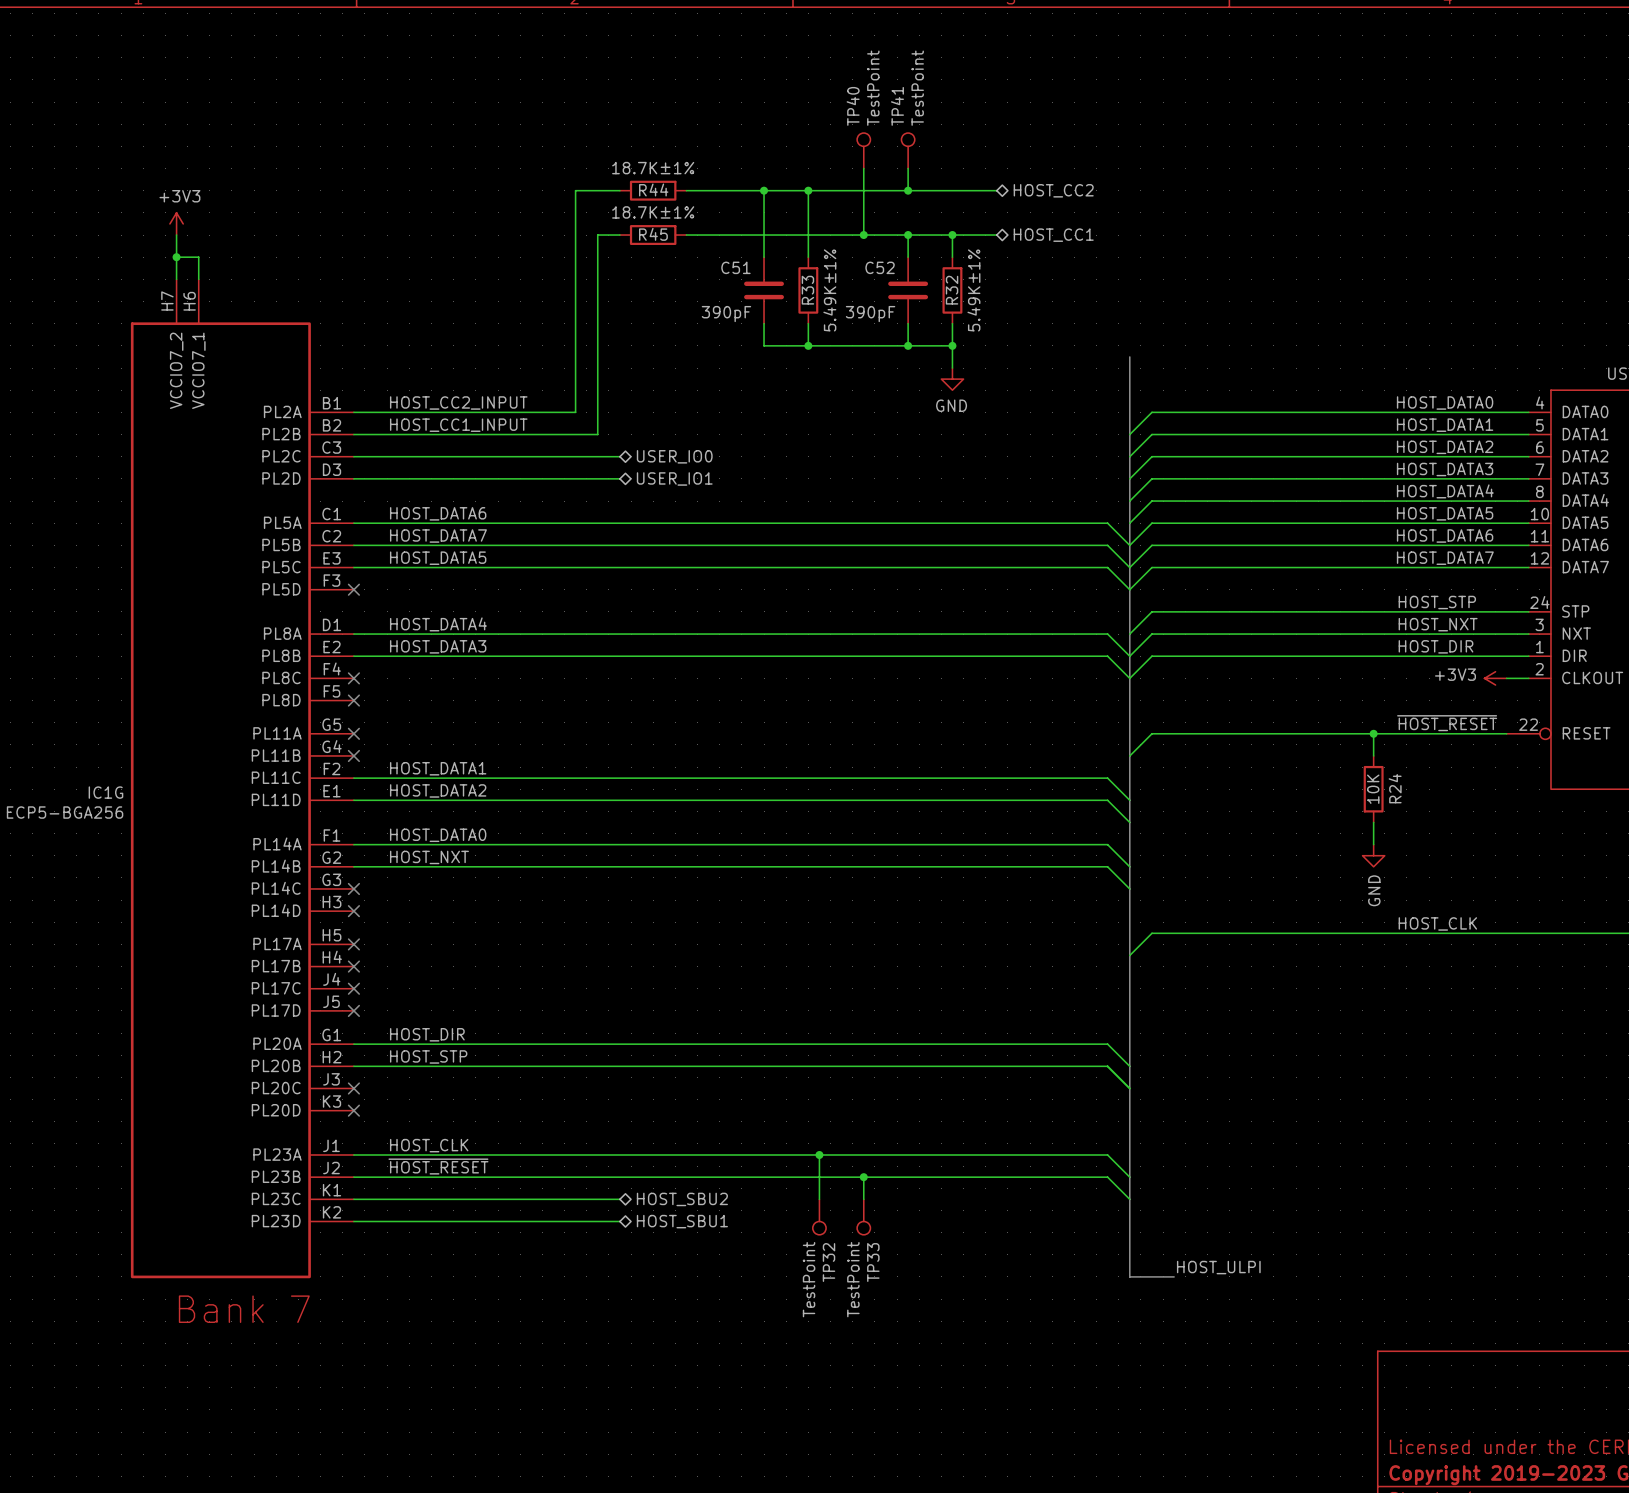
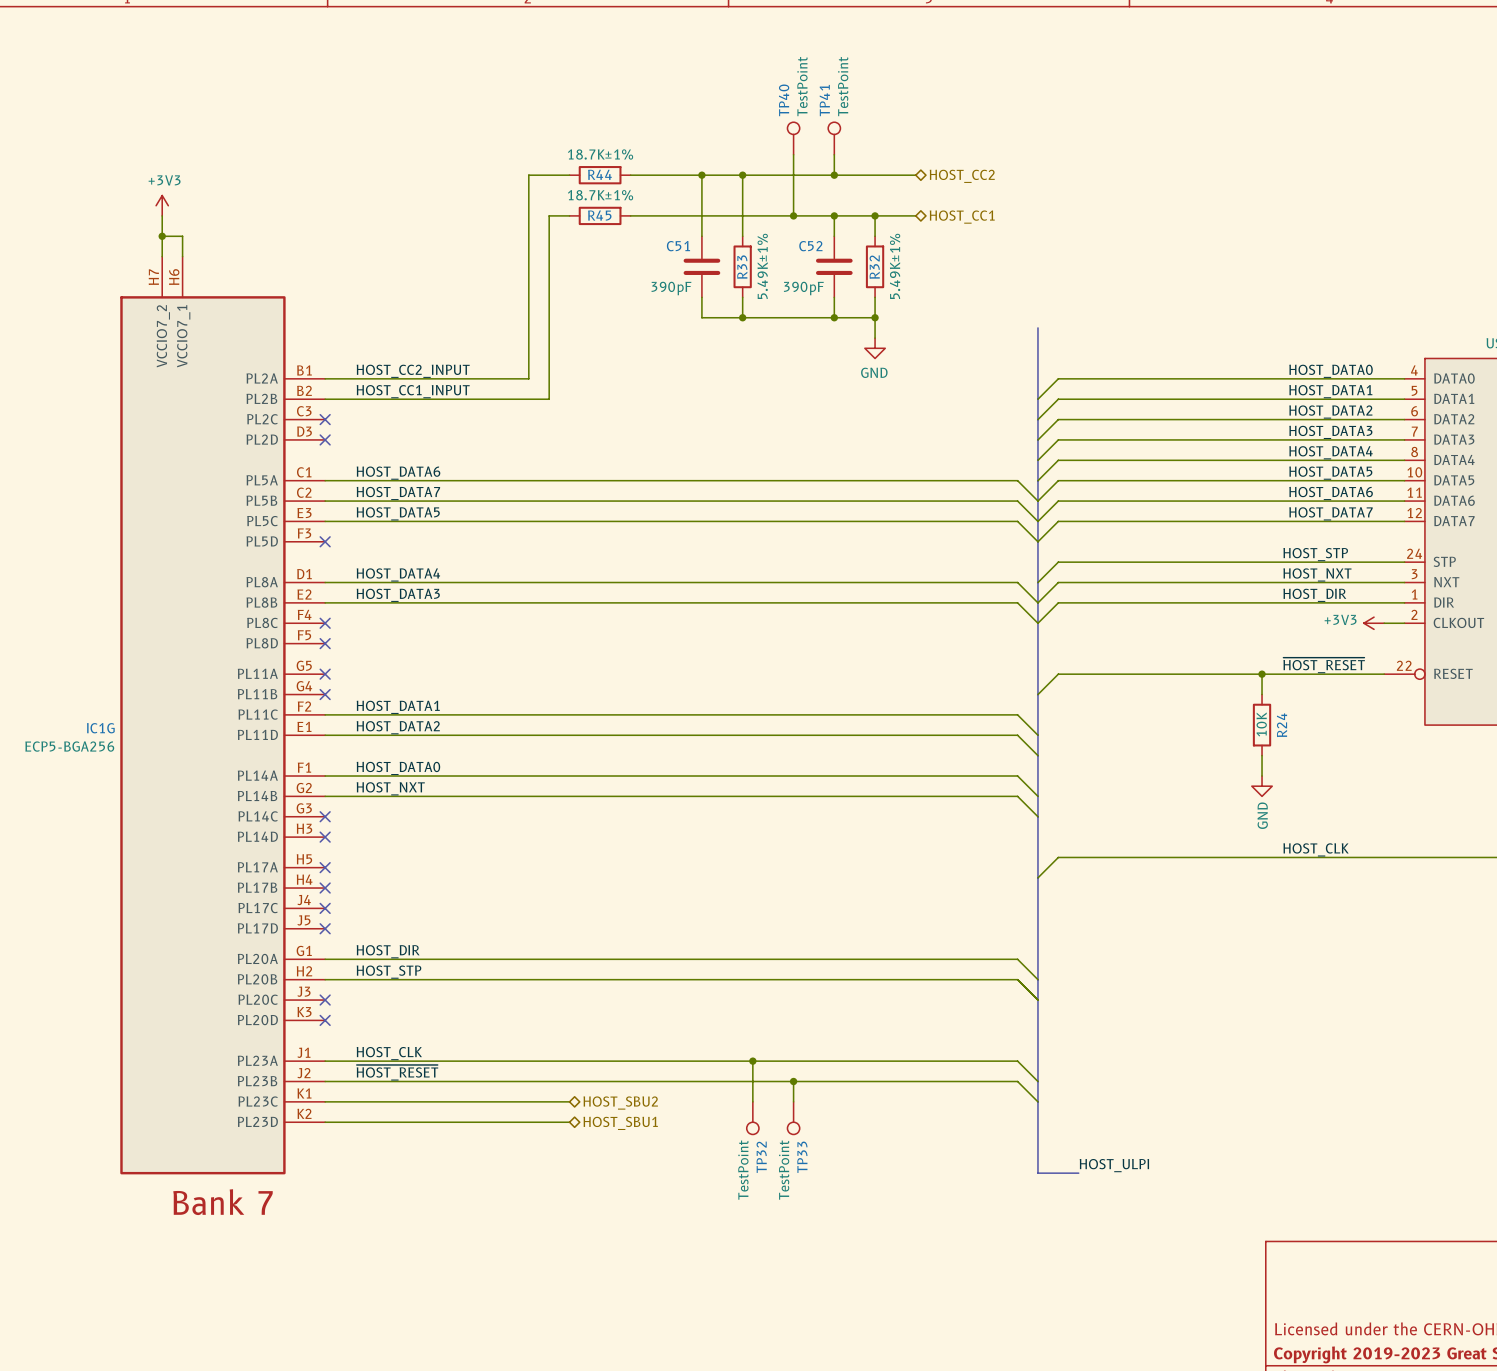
wire: (353, 456) (619, 456) -> none
no-connect mark: none -> (325, 419)
hierarchical label: USER_IO0 (674, 456) -> none
wire: (353, 478) (619, 478) -> none
no-connect mark: none -> (325, 439)
hierarchical label: USER_IO1 (674, 478) -> none

